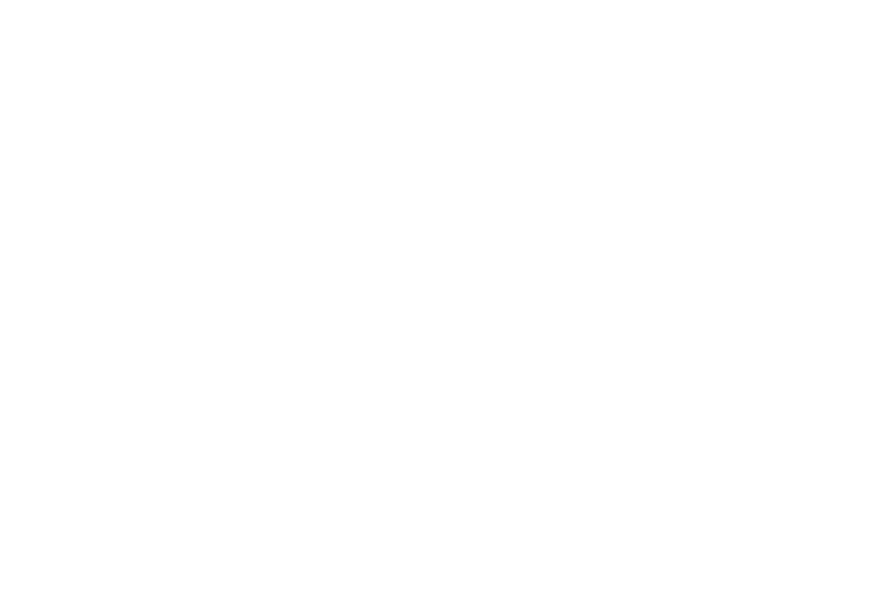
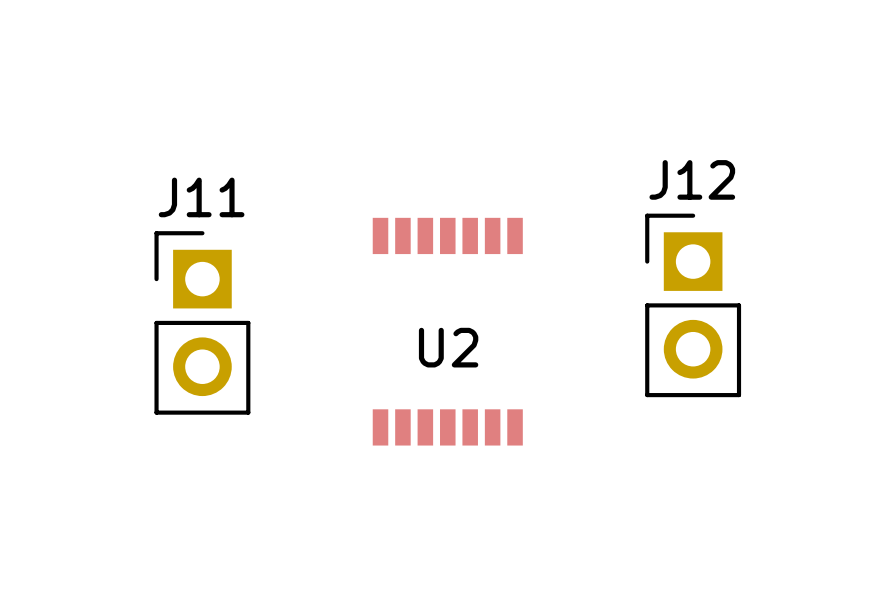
J12: none -> (693, 305)
J11: none -> (202, 322)
U2: none -> (447, 331)

